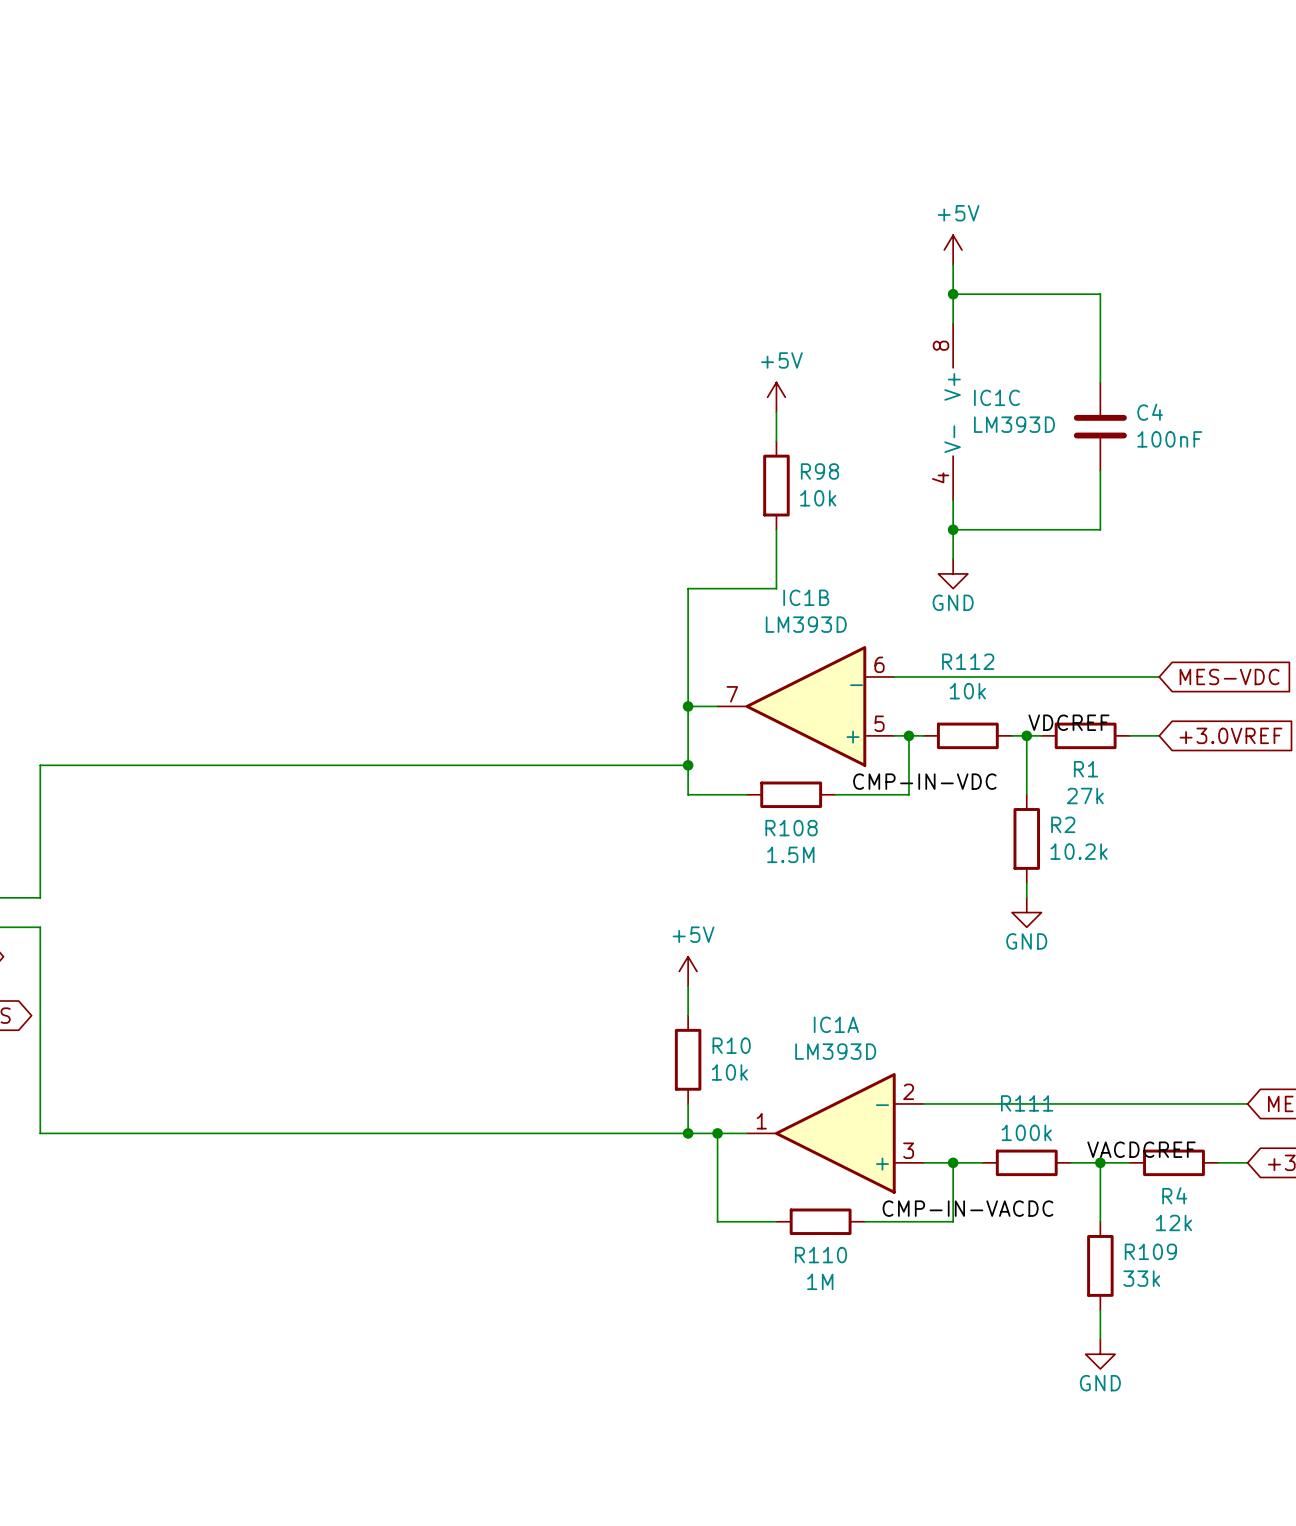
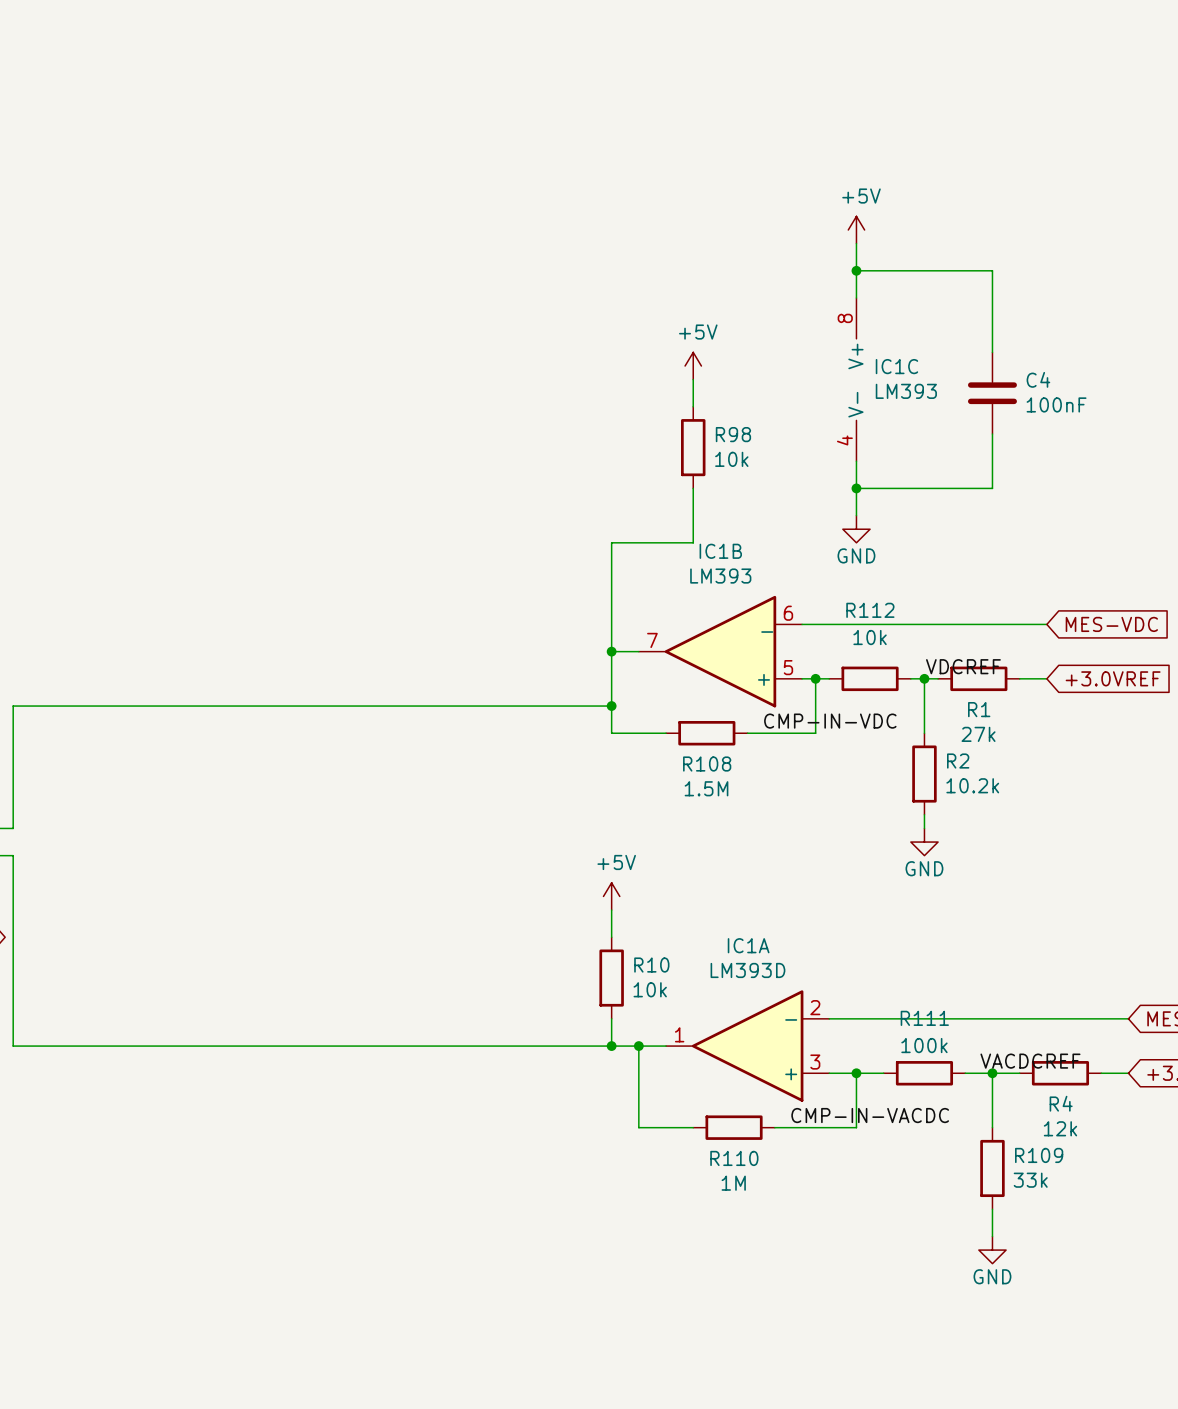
IC1C value: LM393D (1014, 424) -> LM393 (906, 391)
IC1B value: LM393D (806, 624) -> LM393 (720, 576)

